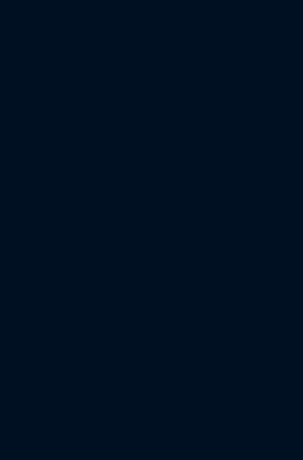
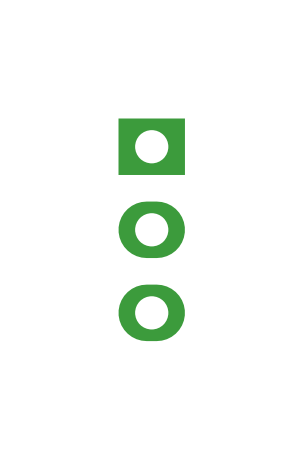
part: none -> (151, 229)

